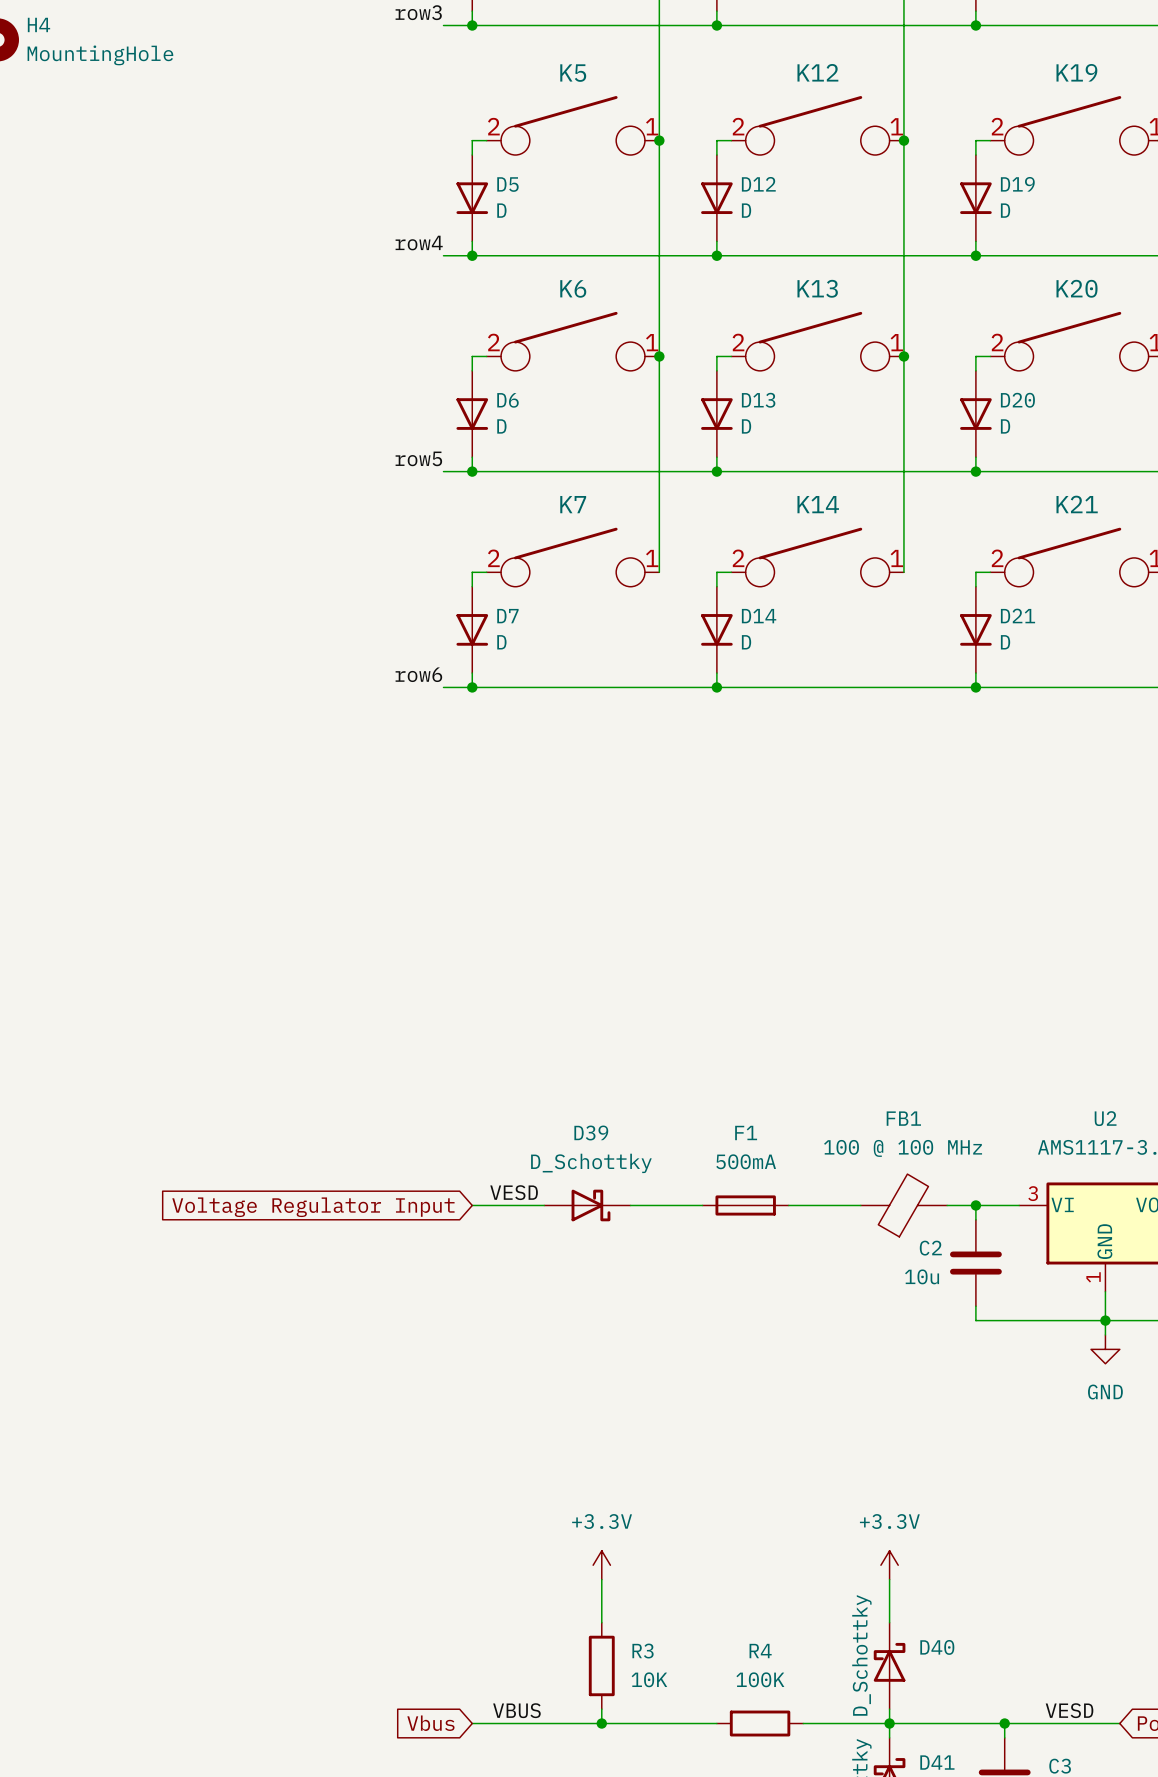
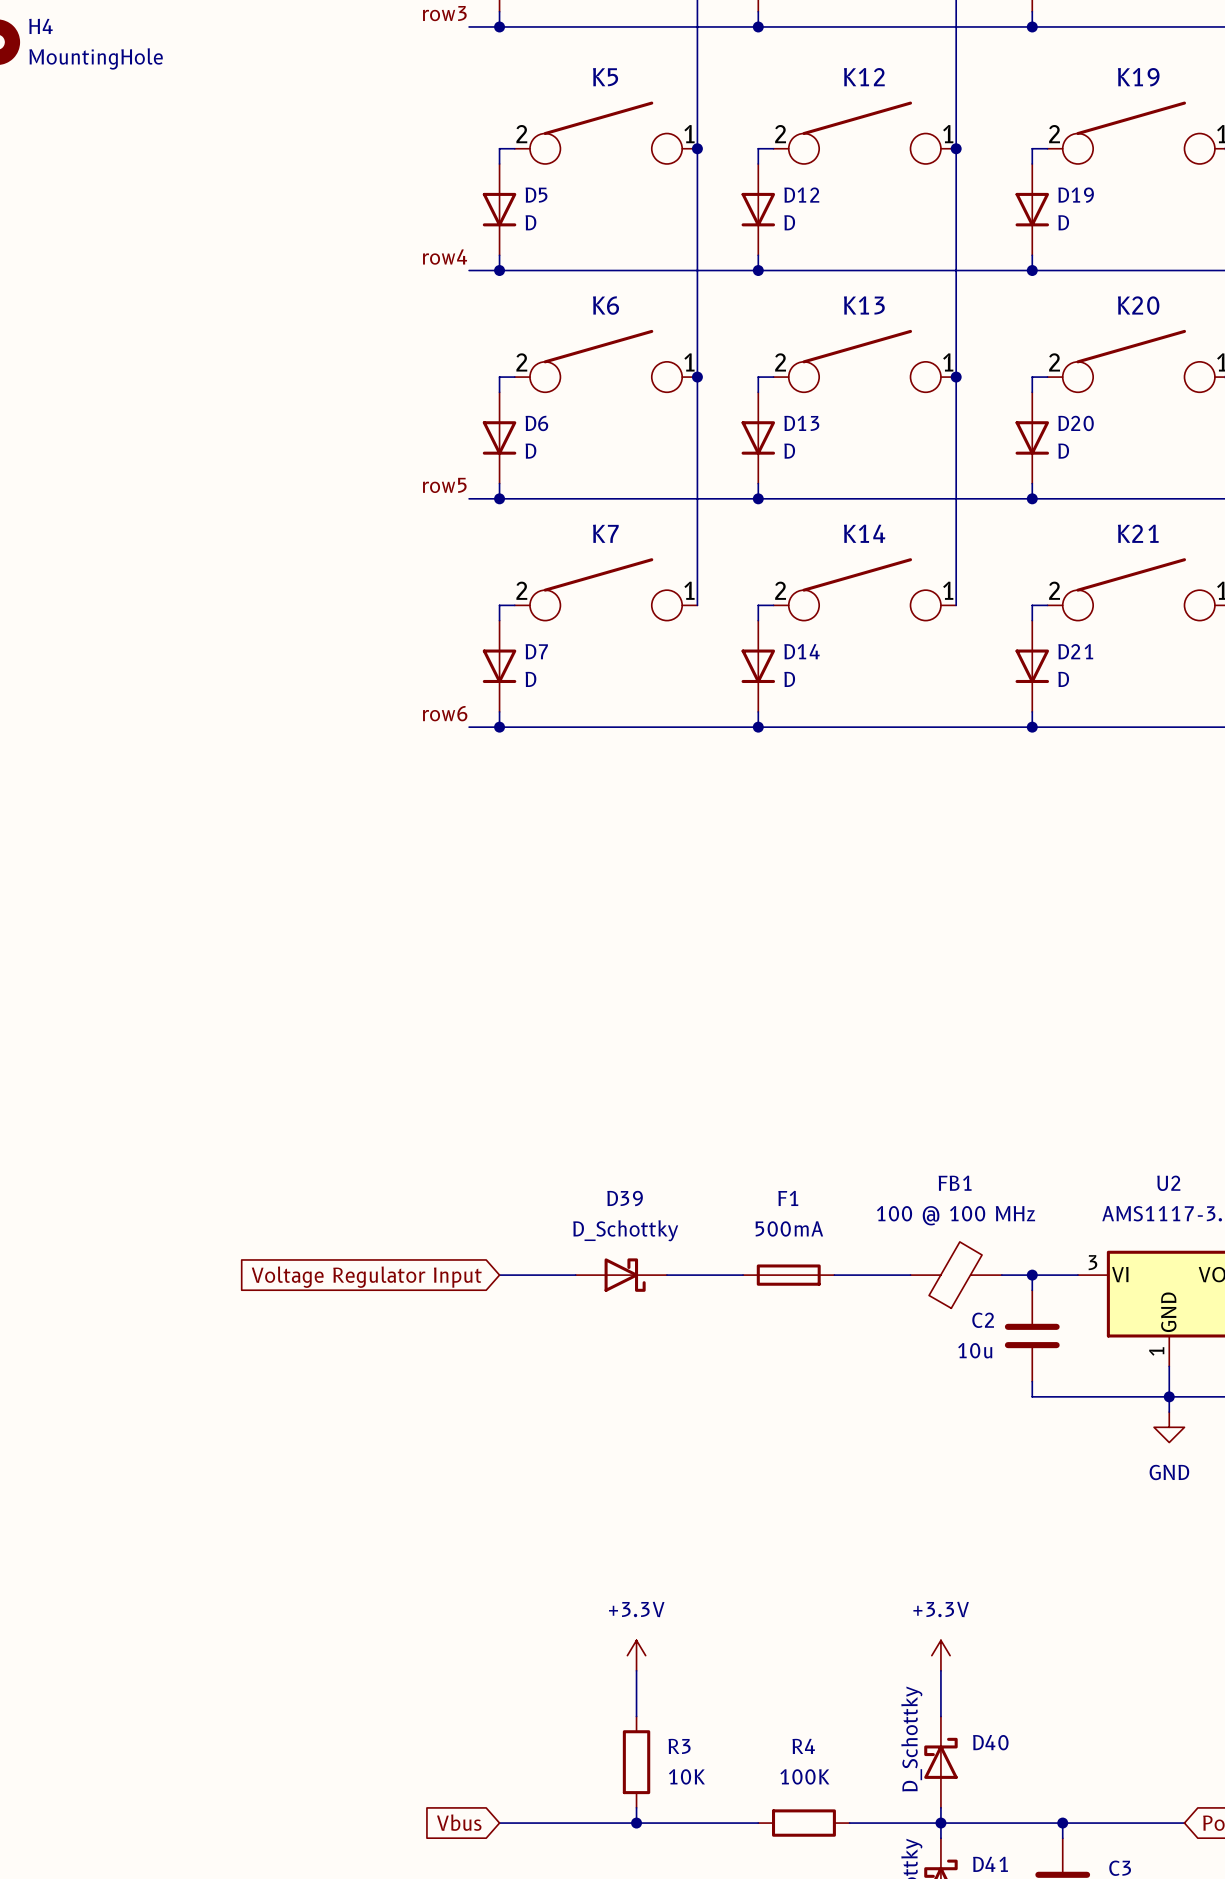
label: VESD (514, 1192) -> none
label: VBUS (516, 1710) -> none
label: VESD (1069, 1710) -> none

